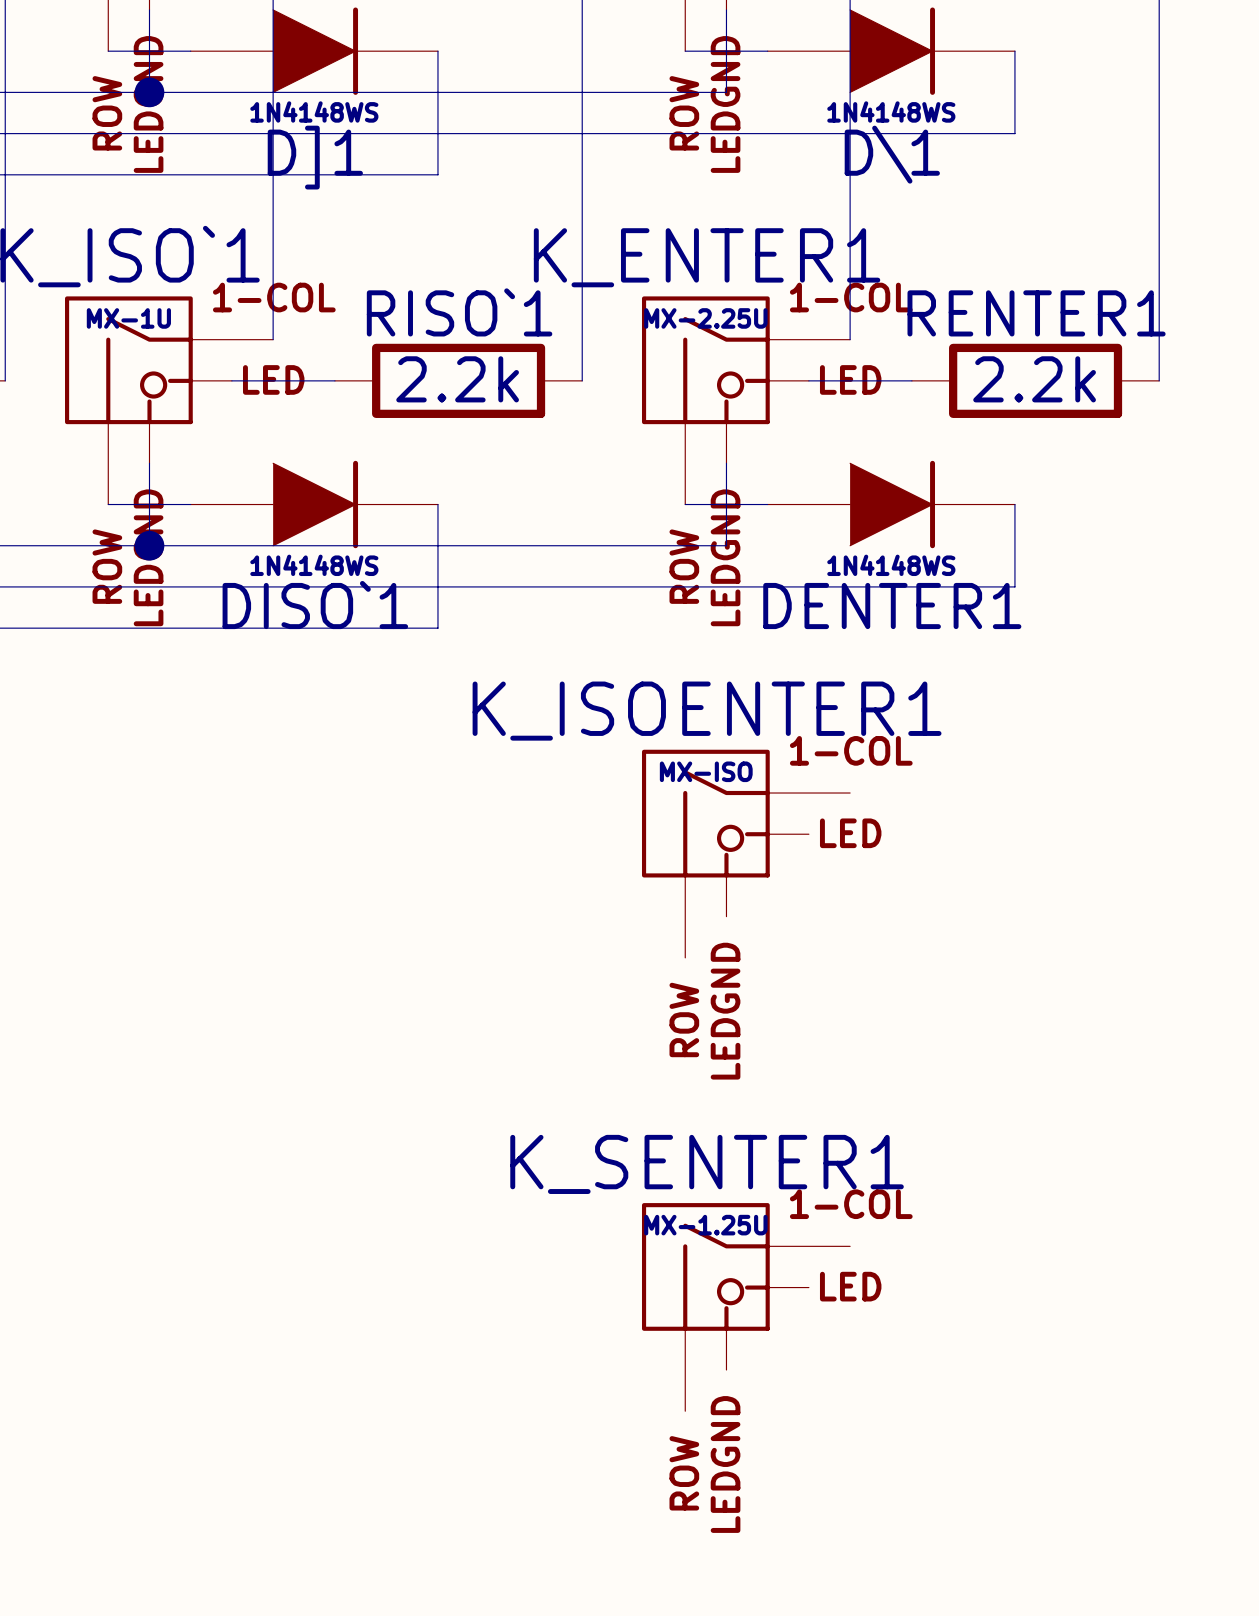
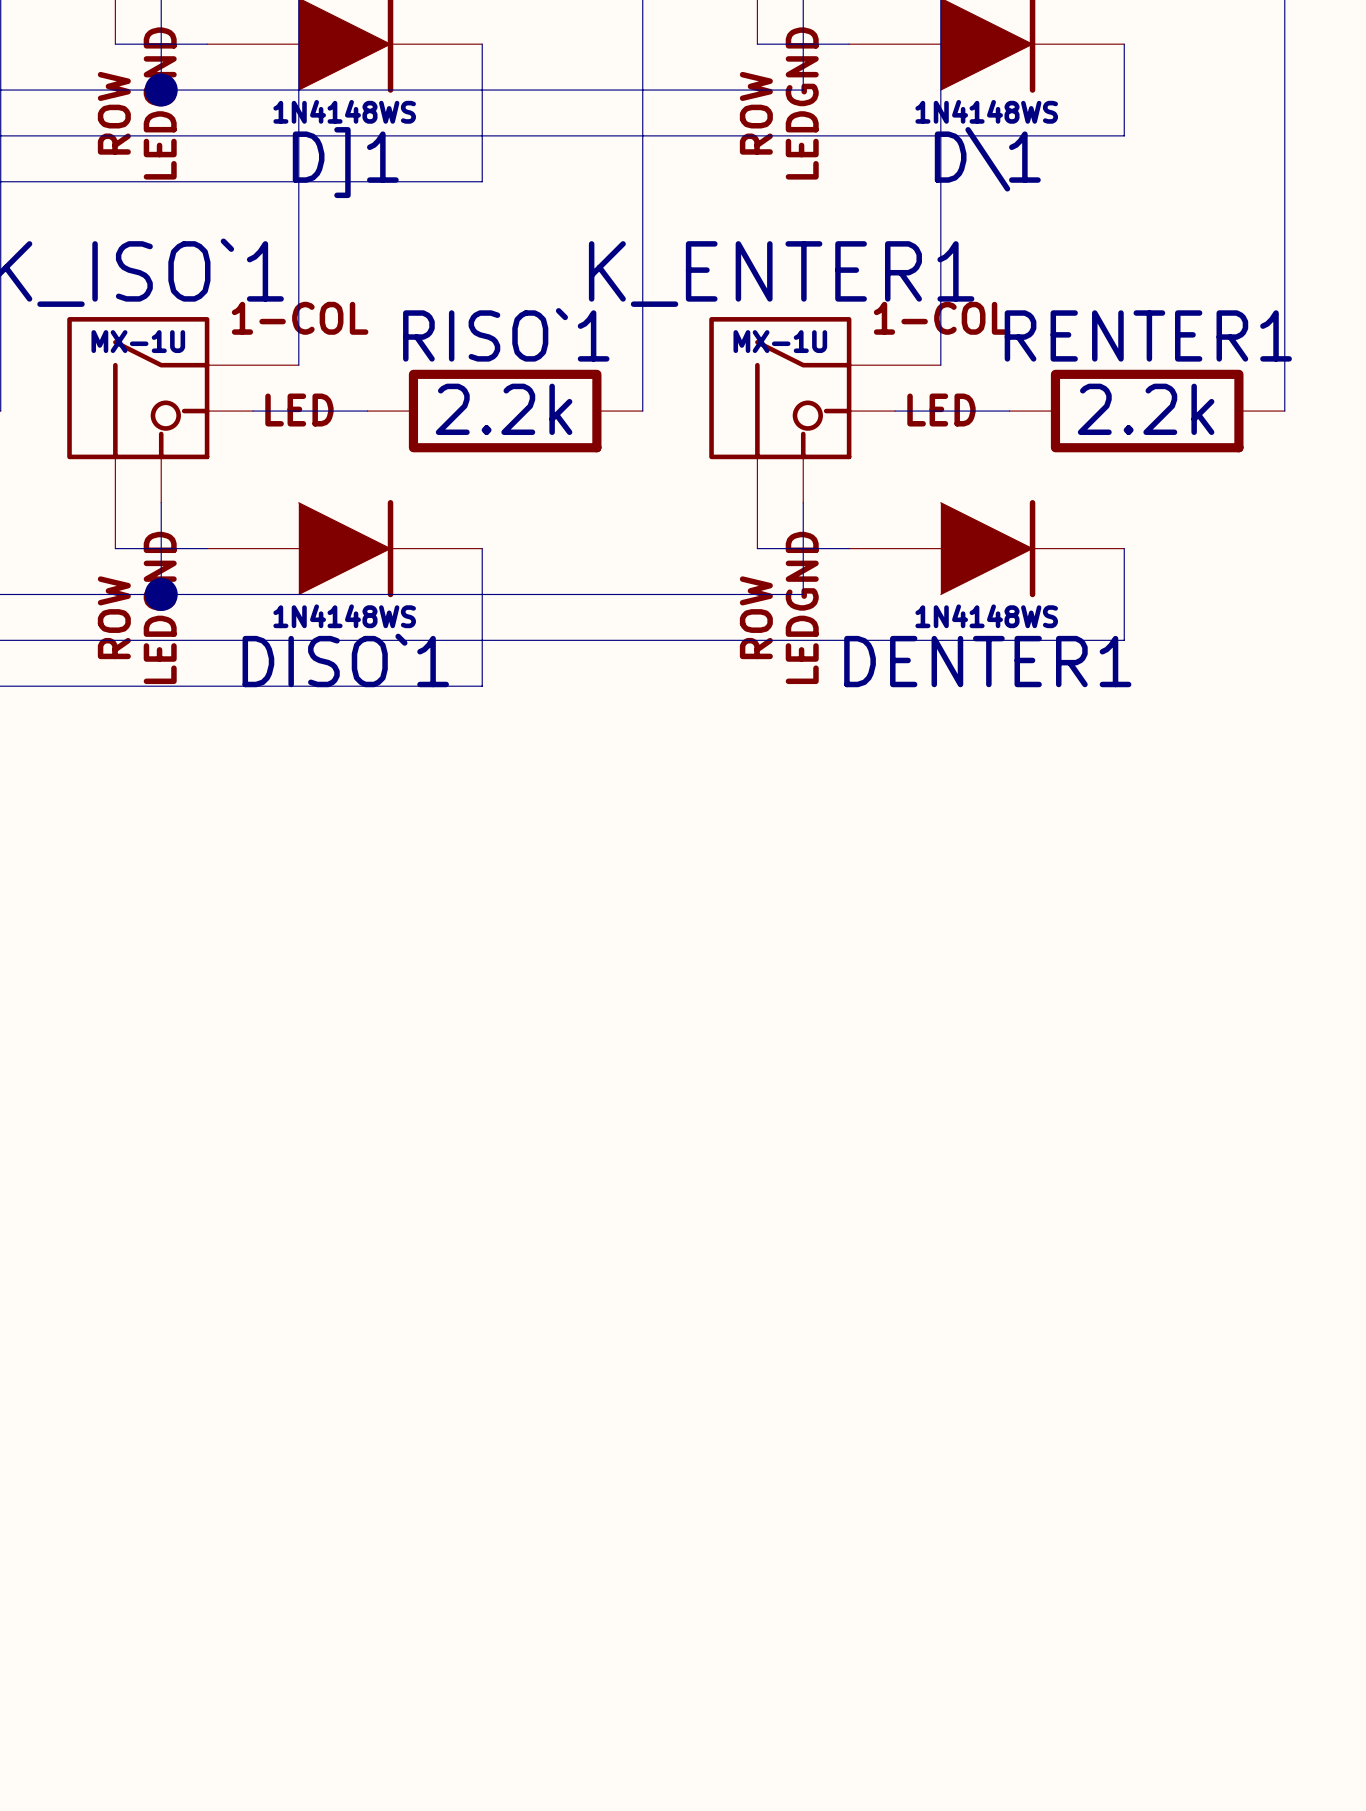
K_ENTER1 value: MX-2.25U (705, 318) -> MX-1U (780, 341)
K_ISOENTER1: MX-ISO (746, 853) -> none
K_SENTER1: MX-1.25U (746, 1307) -> none

